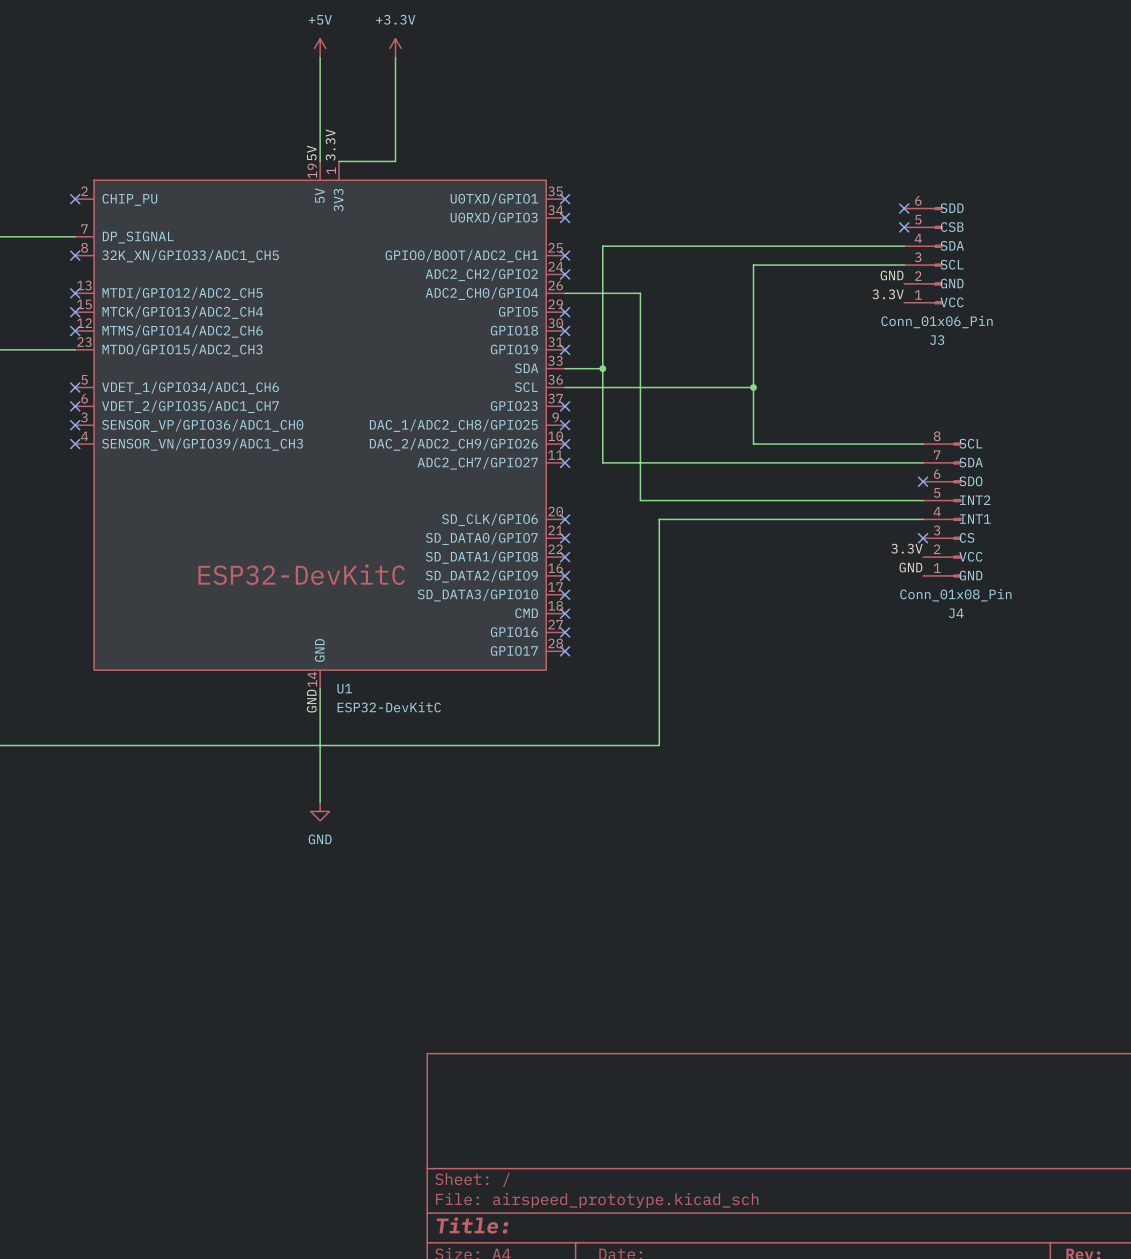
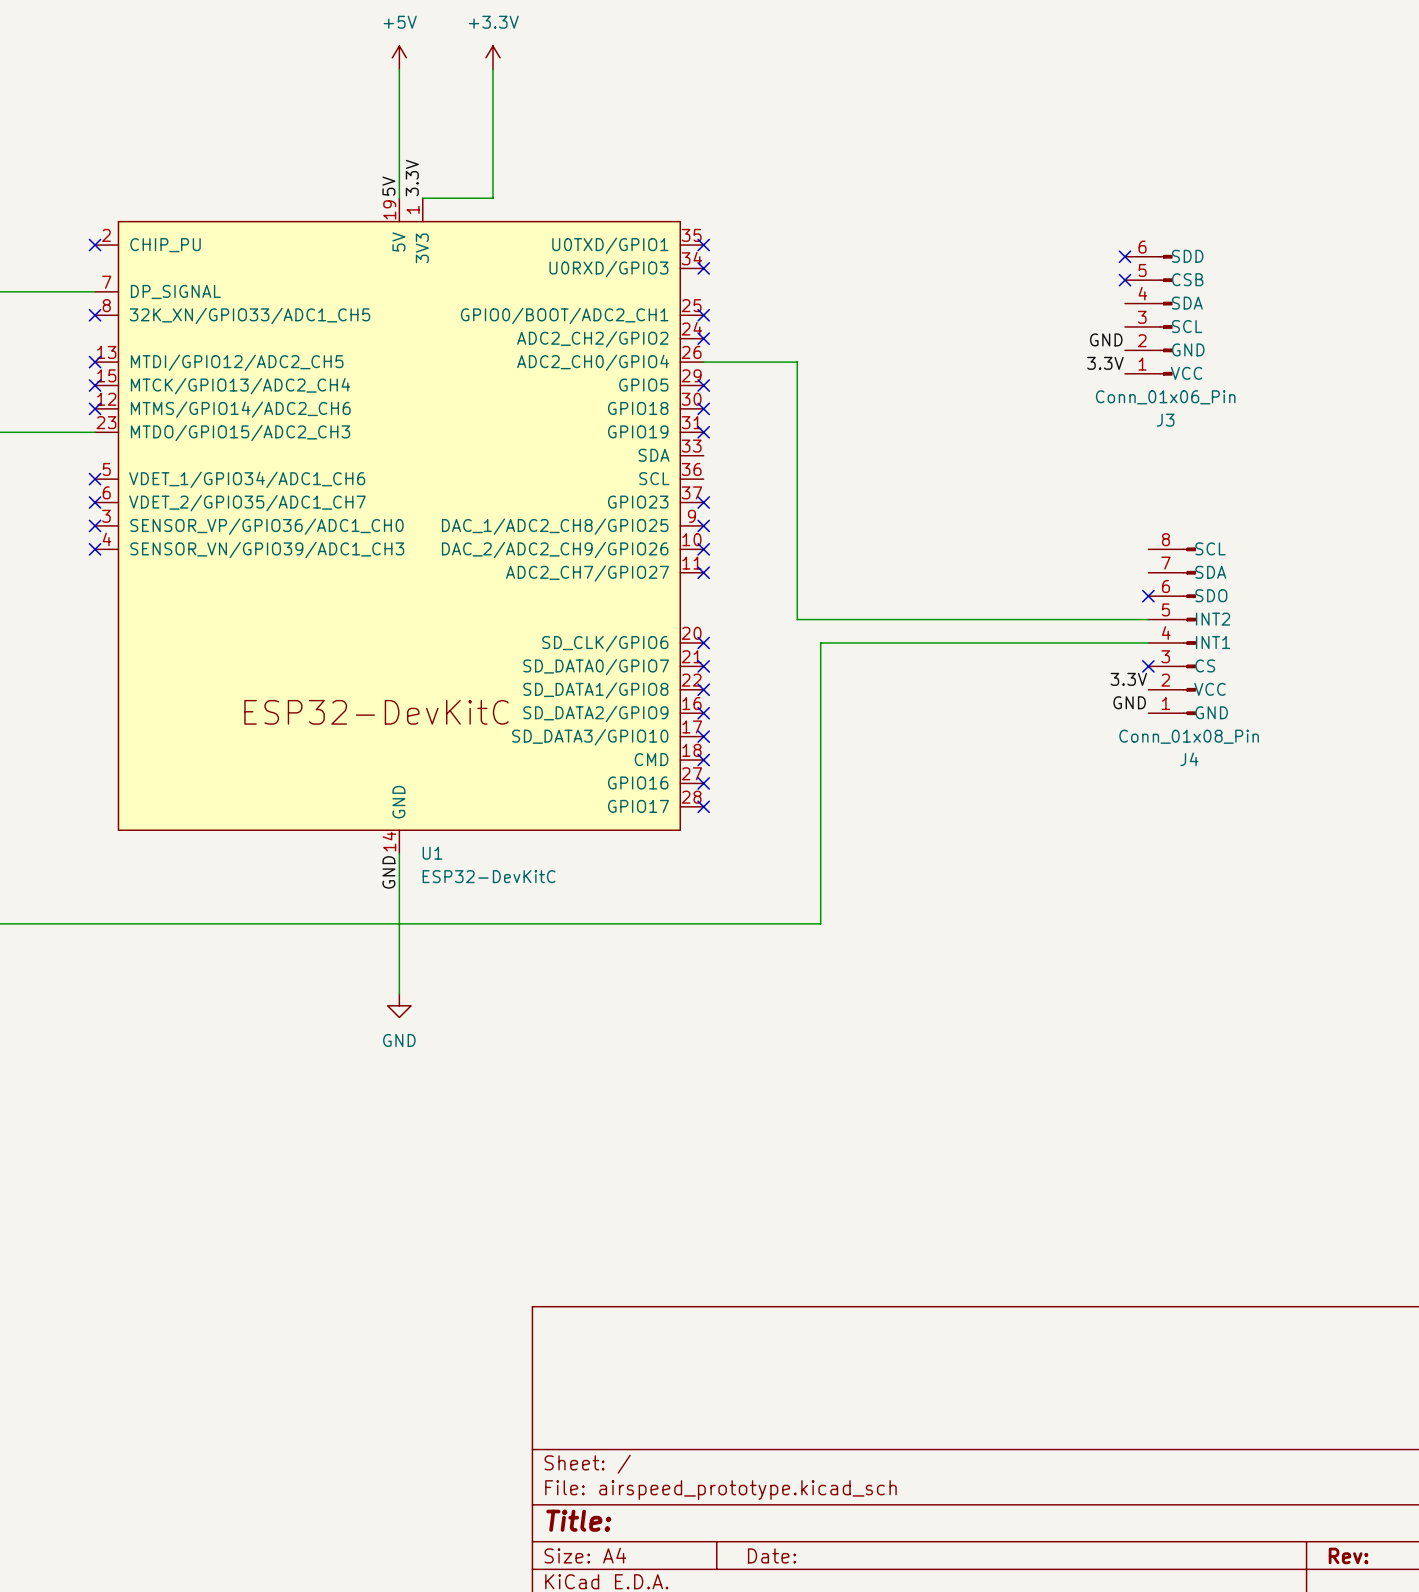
wire: (904, 246) (602, 246) (602, 462) (923, 462) -> none
wire: (904, 265) (753, 265) (753, 444) (923, 444) -> none
wire: (565, 368) (602, 368) -> none
junction: (602, 368) -> none
wire: (565, 387) (753, 387) -> none
junction: (753, 387) -> none

